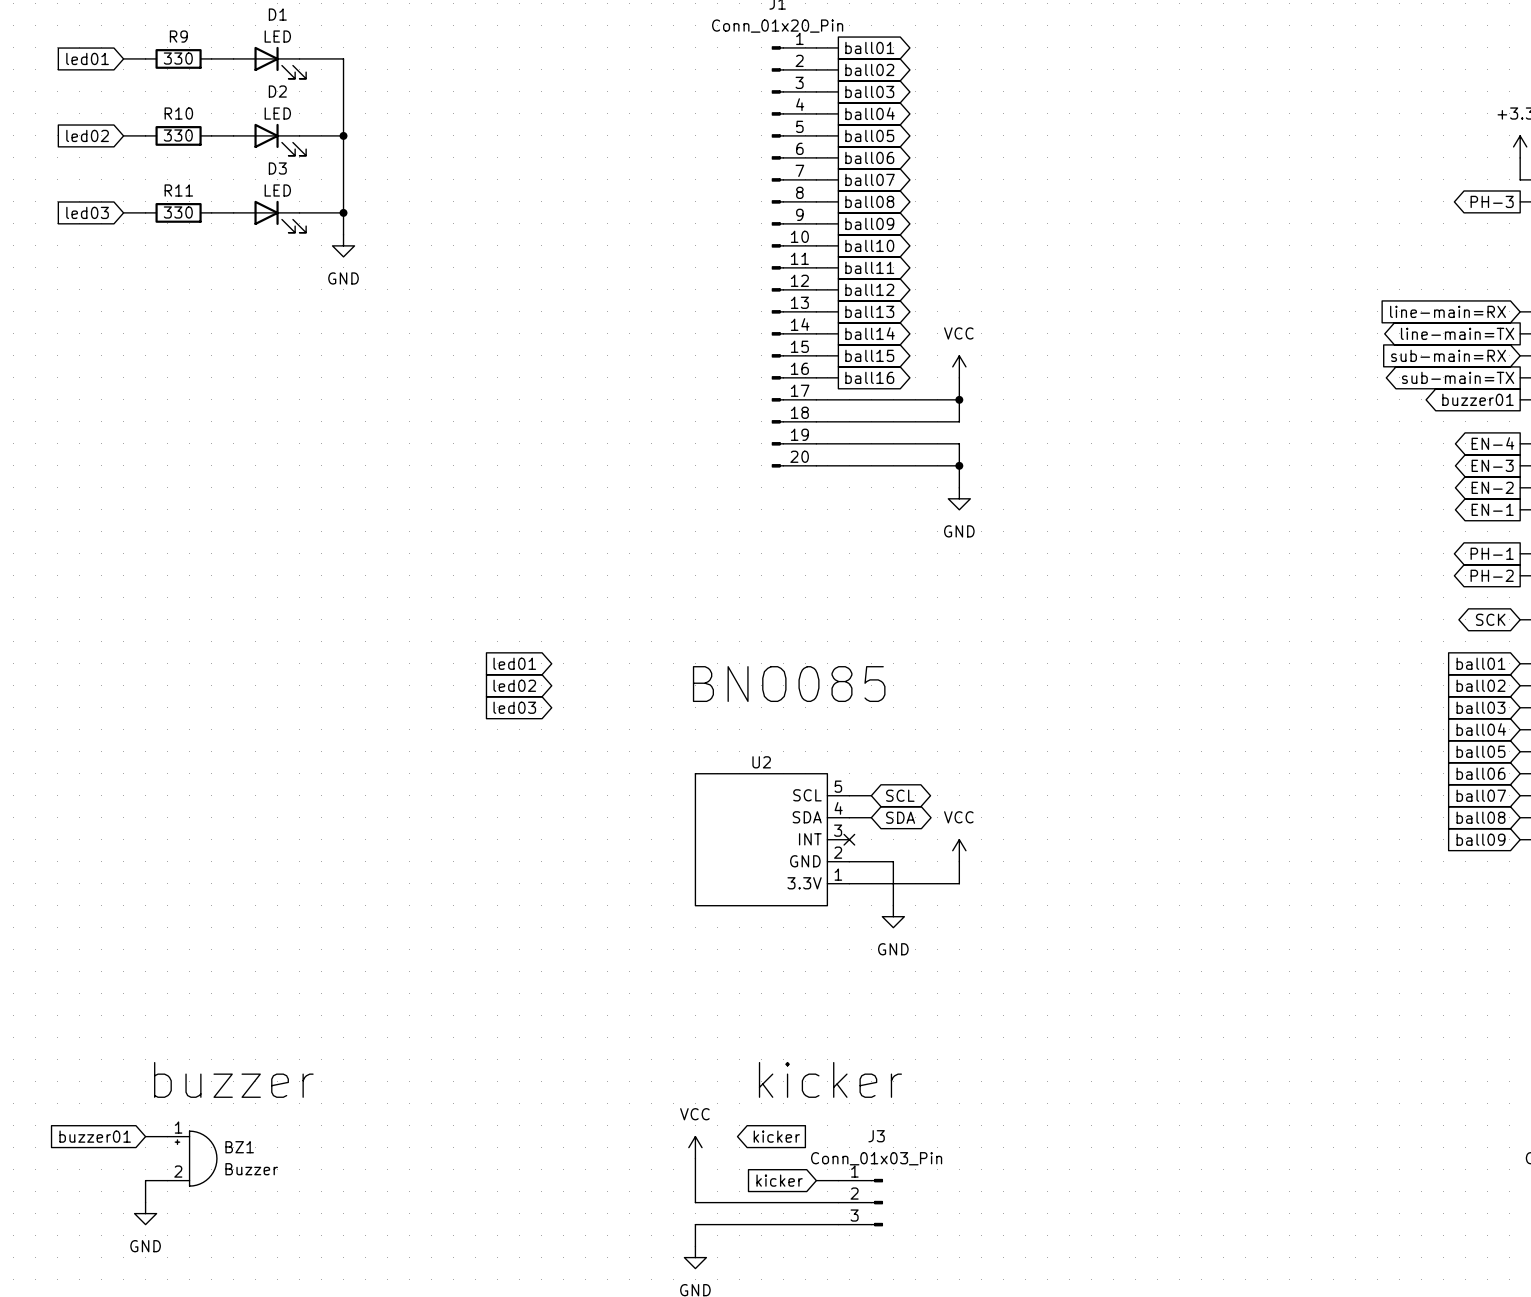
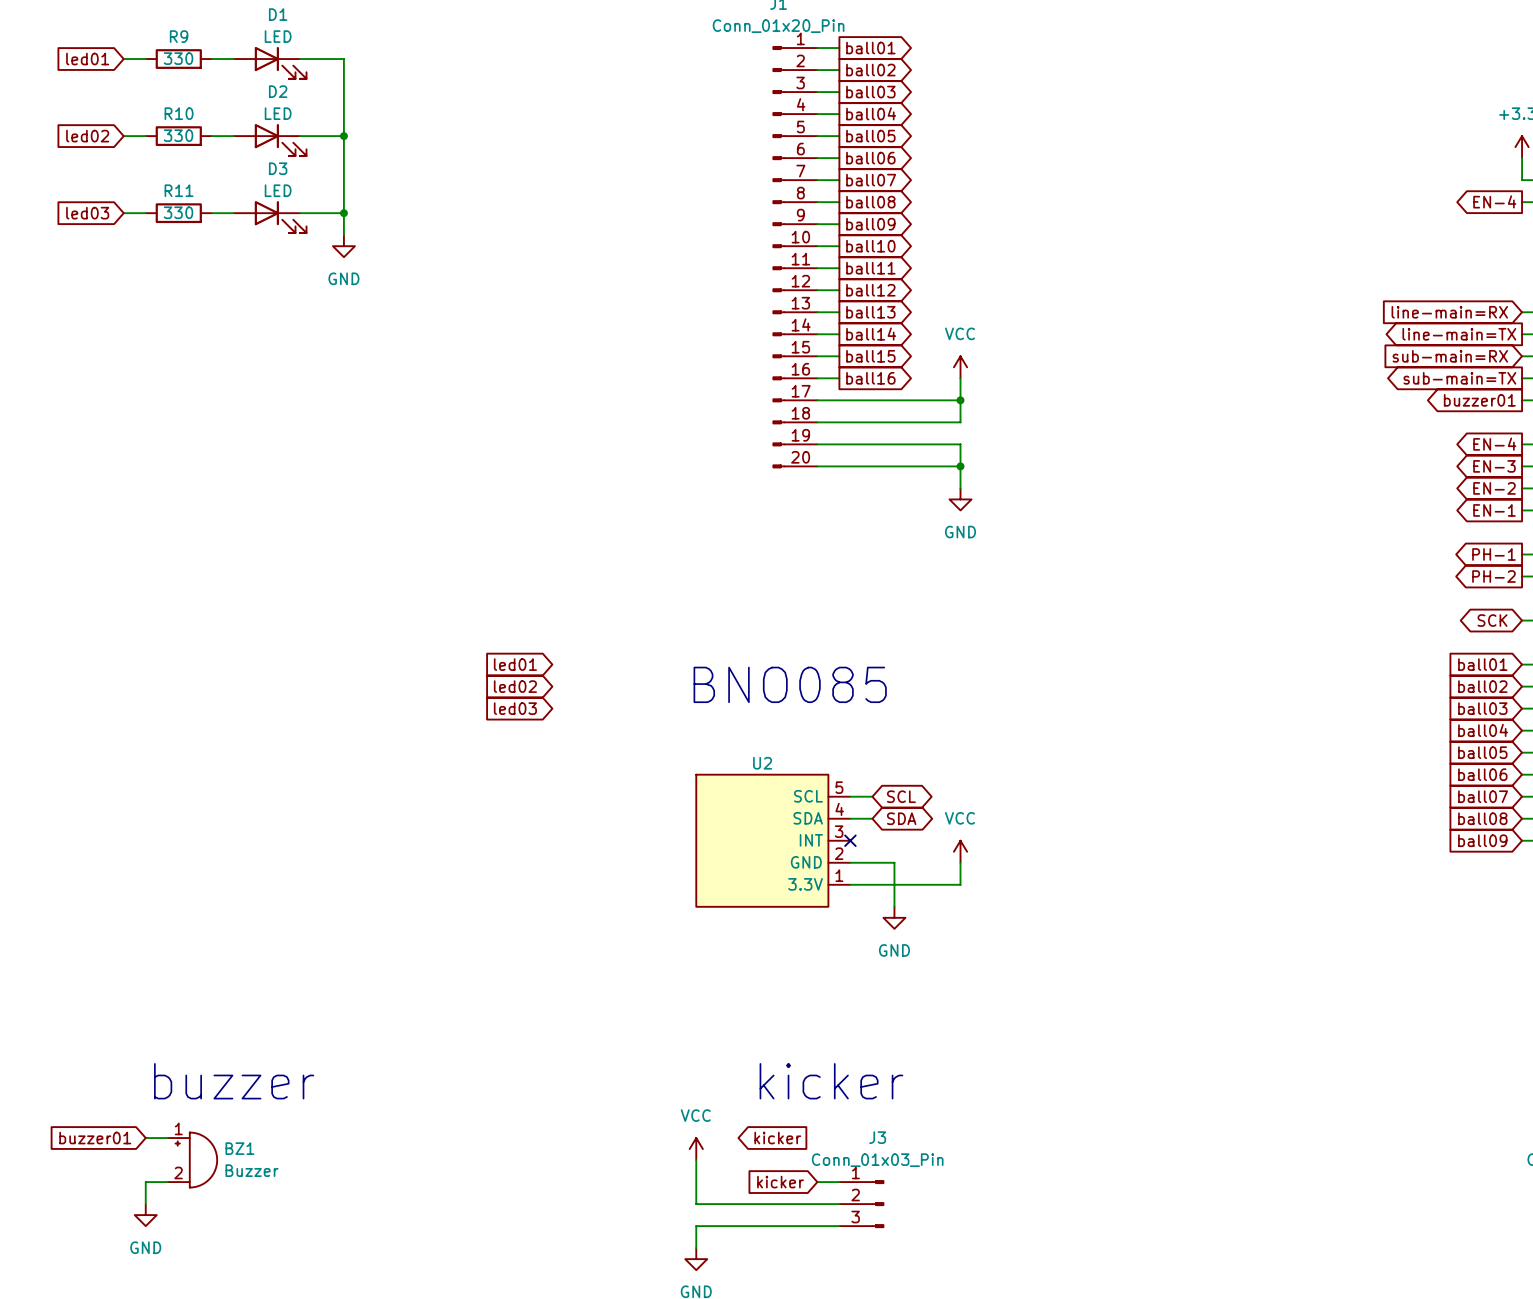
global label: PH-3 (1492, 201) -> EN-4 (1494, 201)

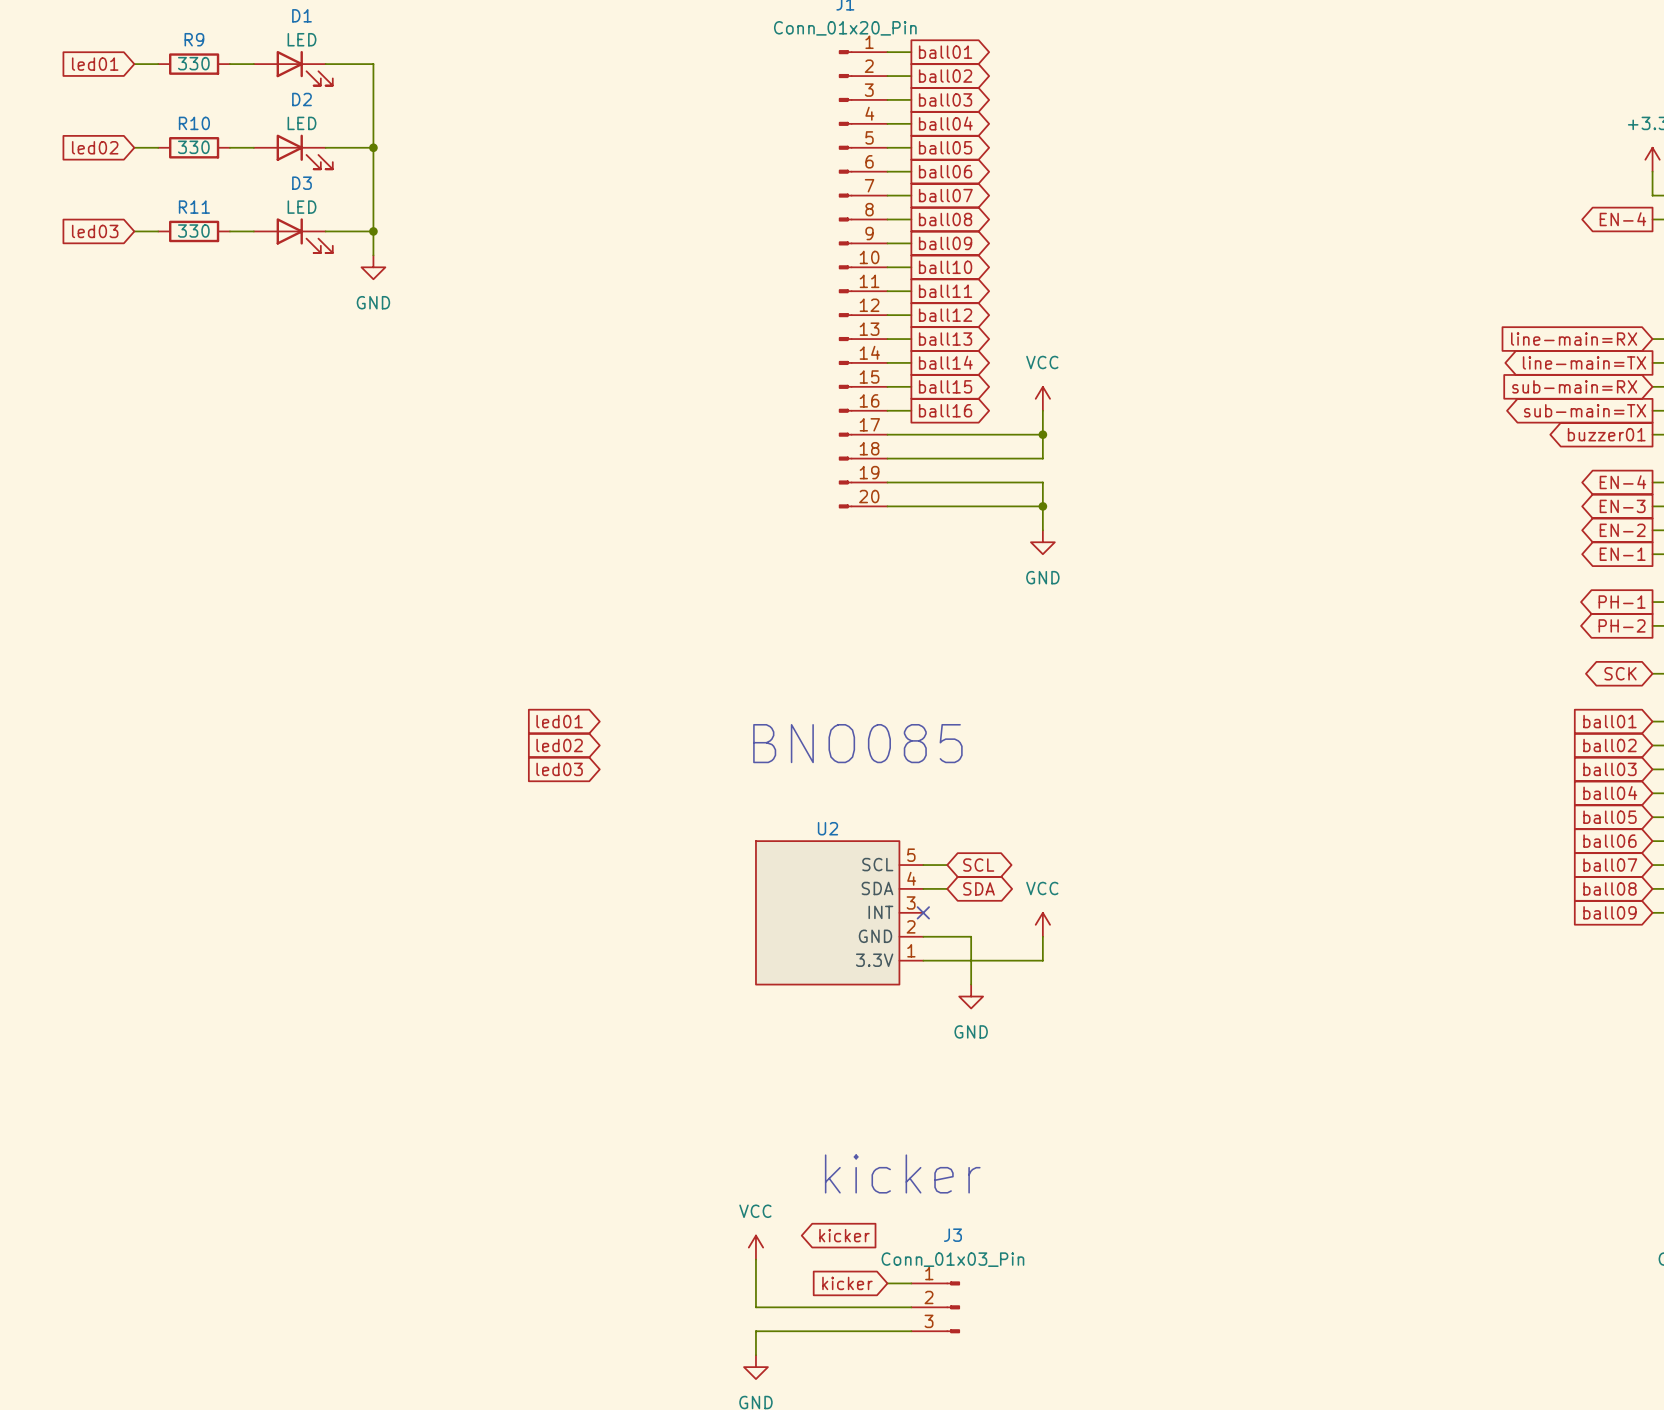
text: buzzer (234, 1081) -> none
global label: buzzer01 (95, 1138) -> none
wire: (145, 1138) (167, 1138) -> none
BZ1: Buzzer (192, 1160) -> none
wire: (167, 1182) (145, 1182) (145, 1204) -> none
power symbol: GND (145, 1215) -> none

